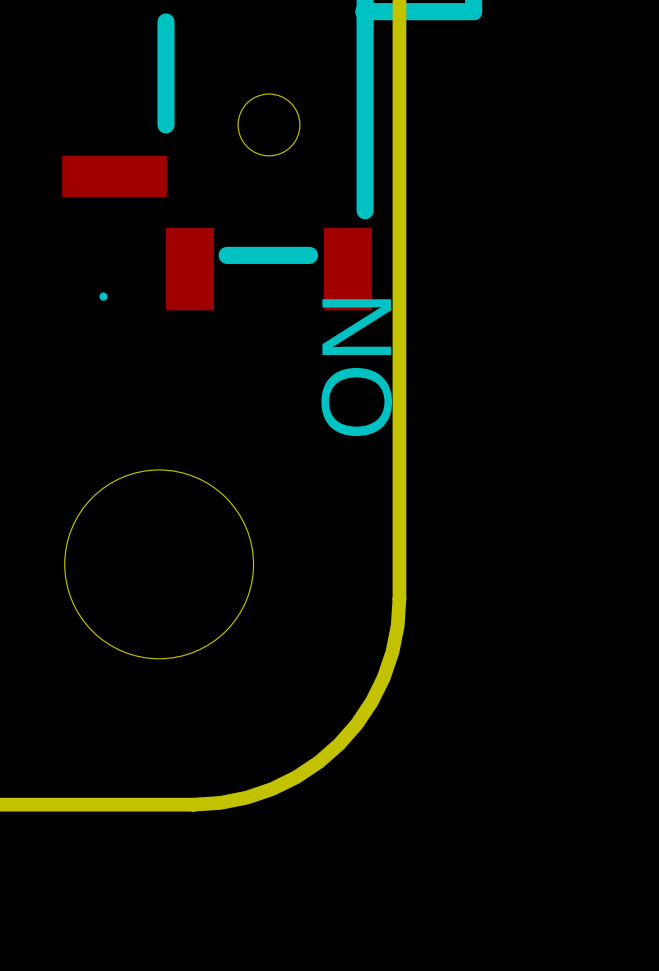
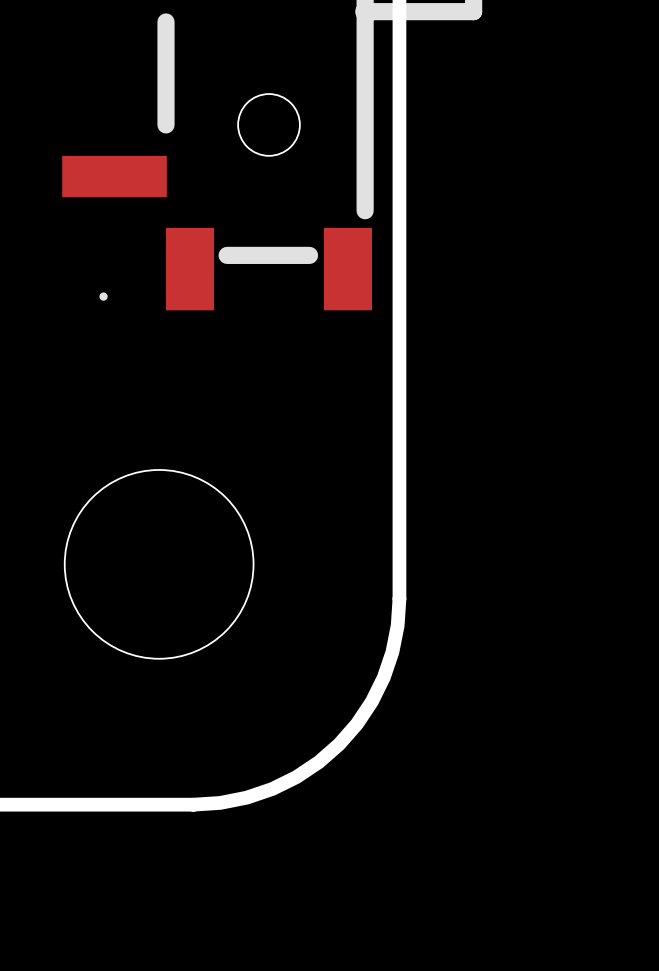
text: ON (356, 367) -> none

